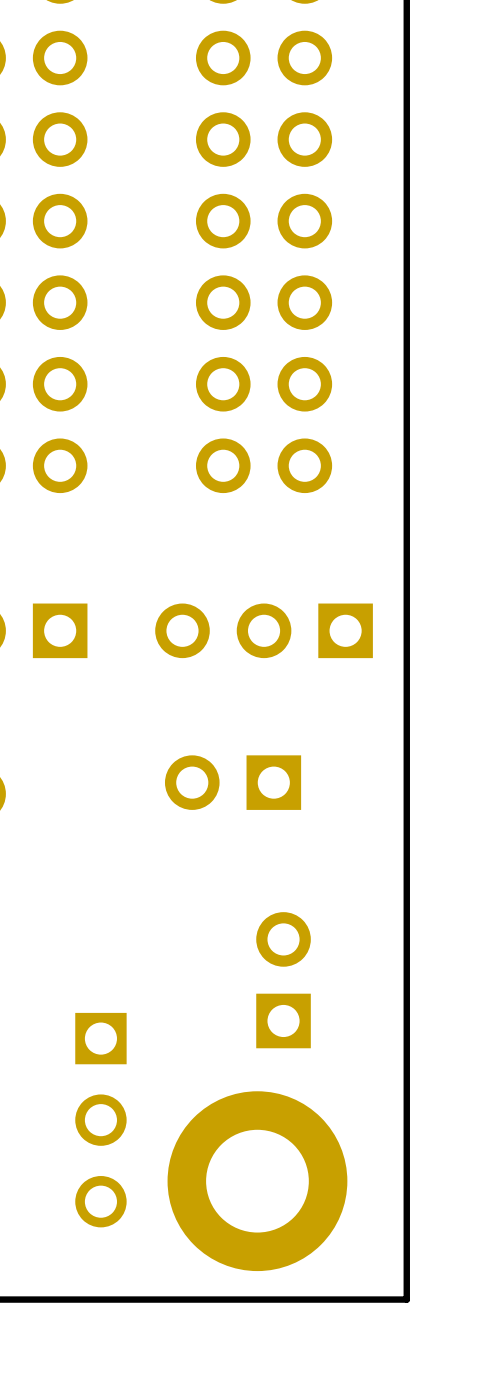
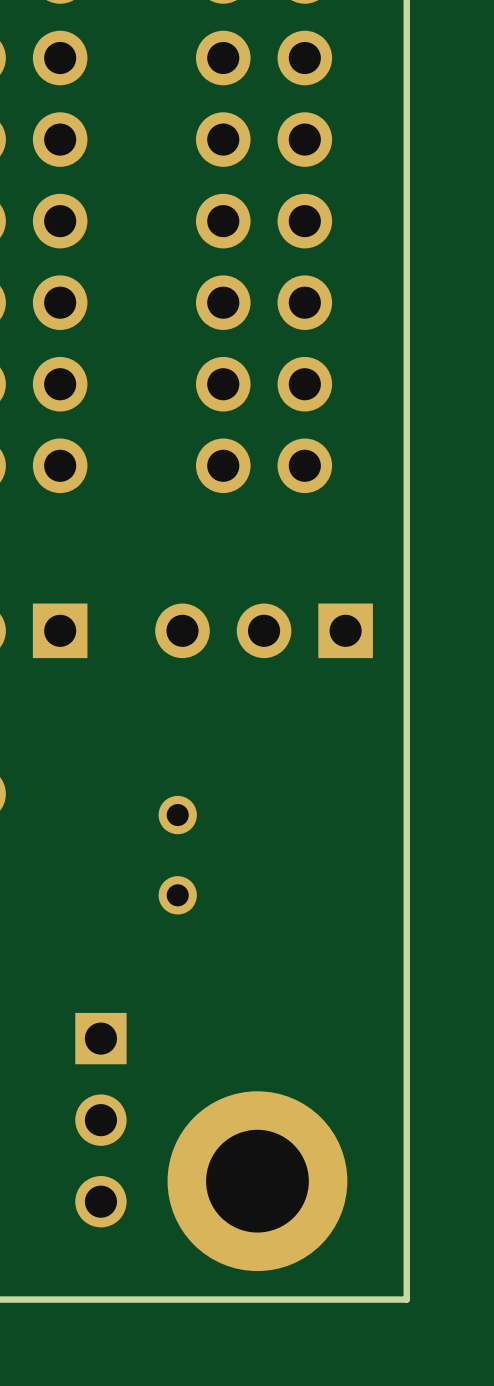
part: (233, 782) -> none
part: none -> (177, 855)
part: (283, 980) -> none

